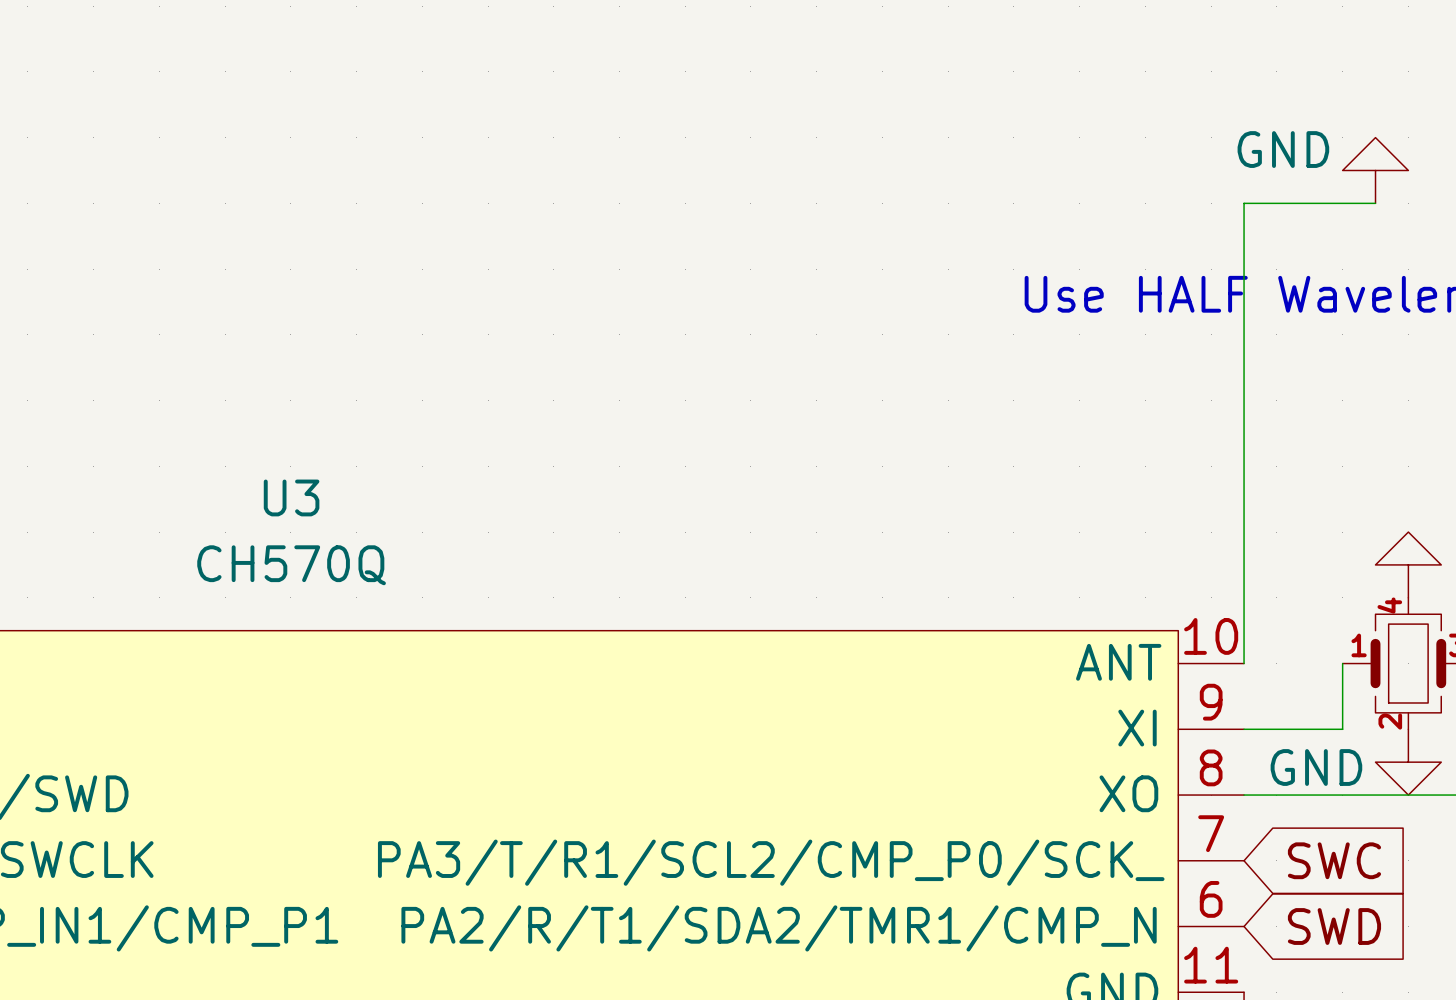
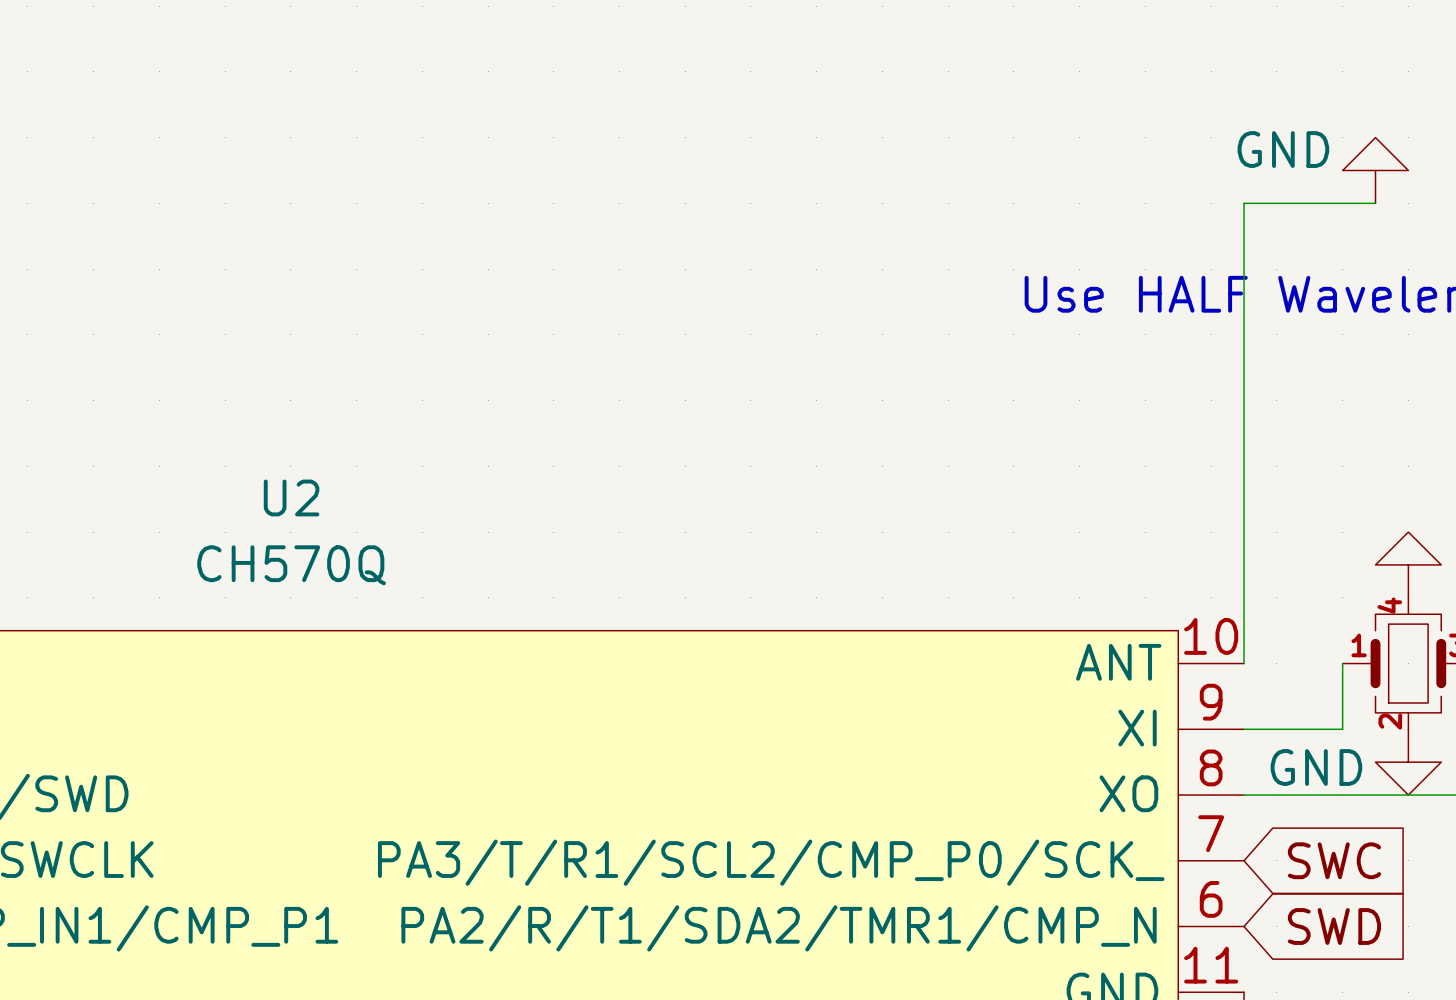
U3 name: U3 (291, 497) -> U2 (291, 497)

